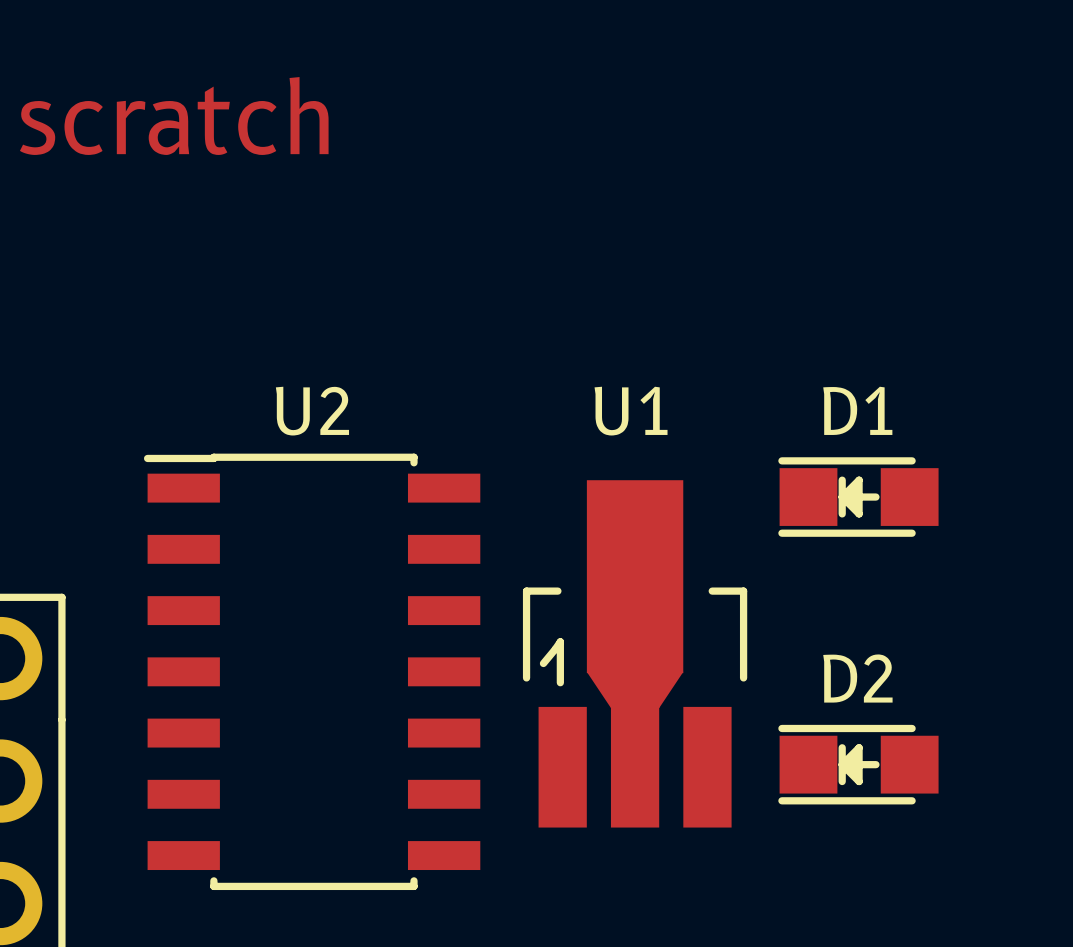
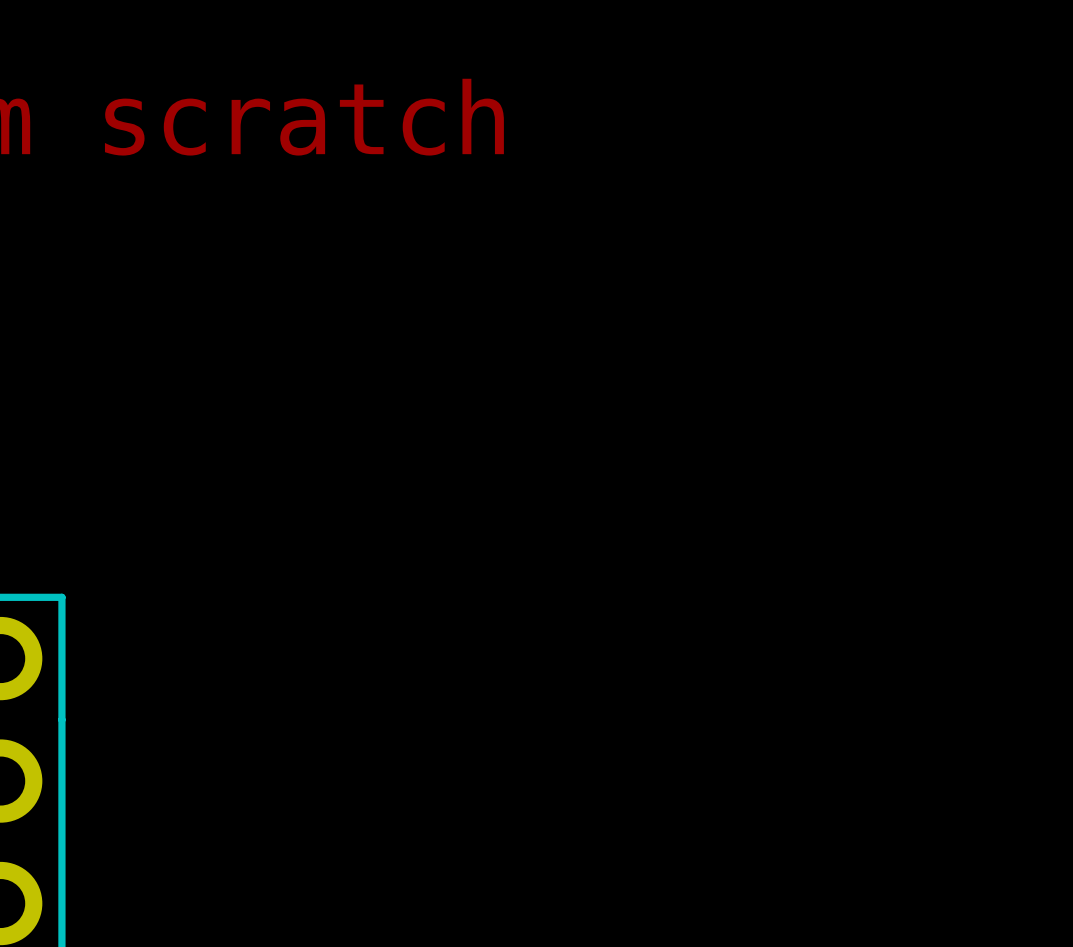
D1: (858, 497) -> none
U1: (635, 653) -> none
U2: (312, 671) -> none
D2: (858, 764) -> none

